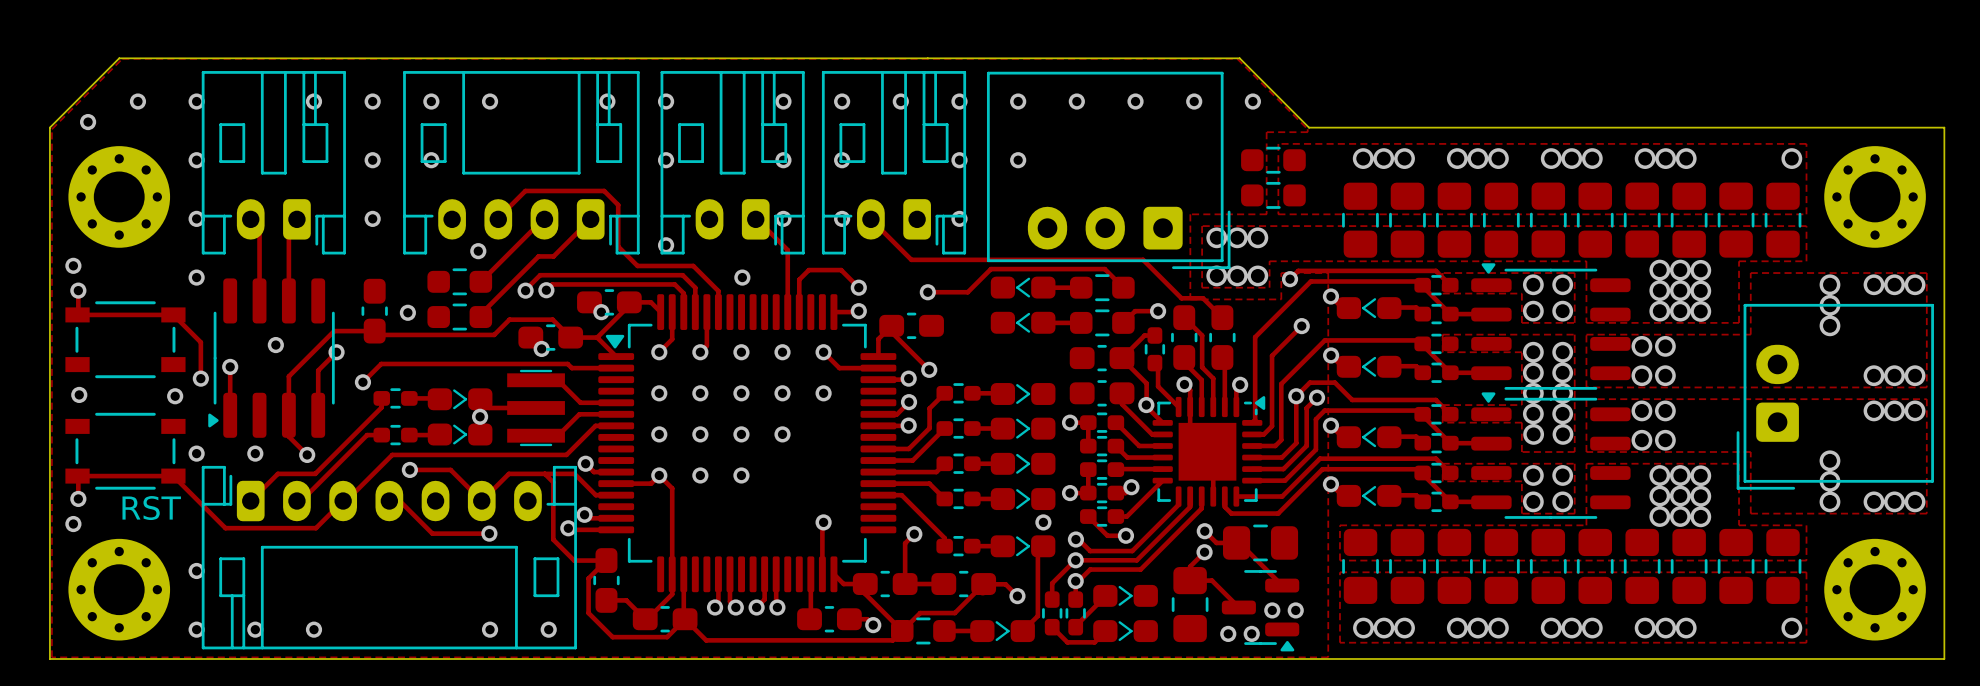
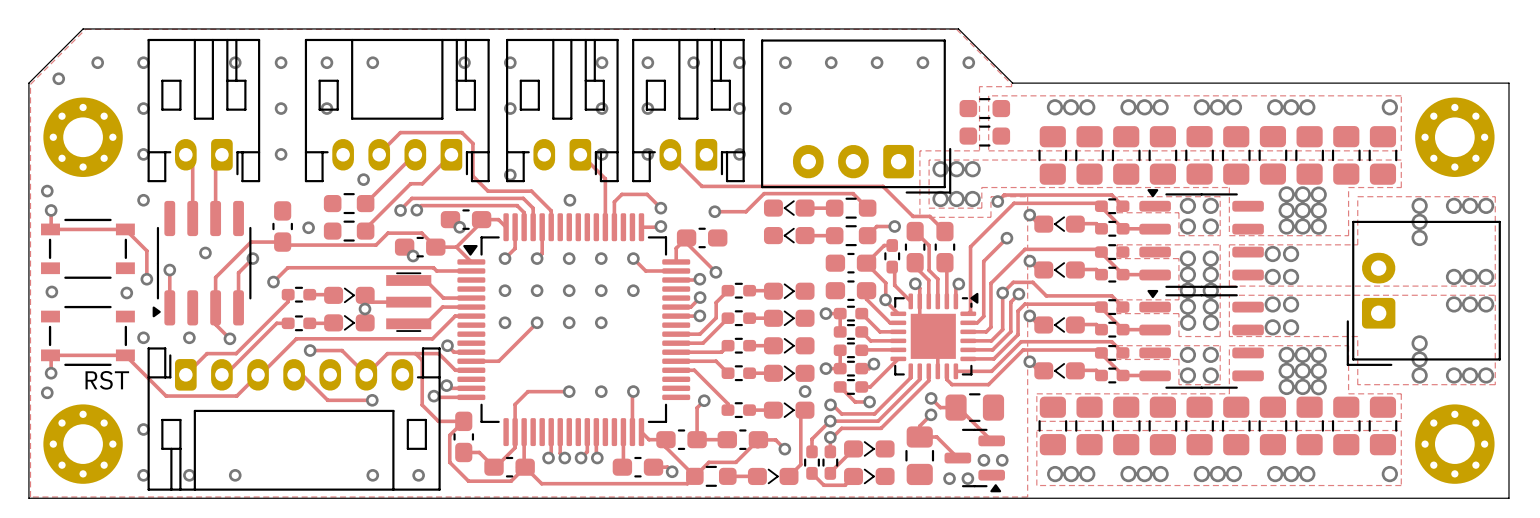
track: none -> (537, 322) (498, 361)
via: (659, 475) -> none
via: (700, 475) -> none
via: (741, 475) -> none
track: (651, 483) (659, 475) (672, 488) (672, 538) -> (569, 391) (527, 391) (515, 404)
via: none -> (569, 391)
via: none -> (601, 391)

